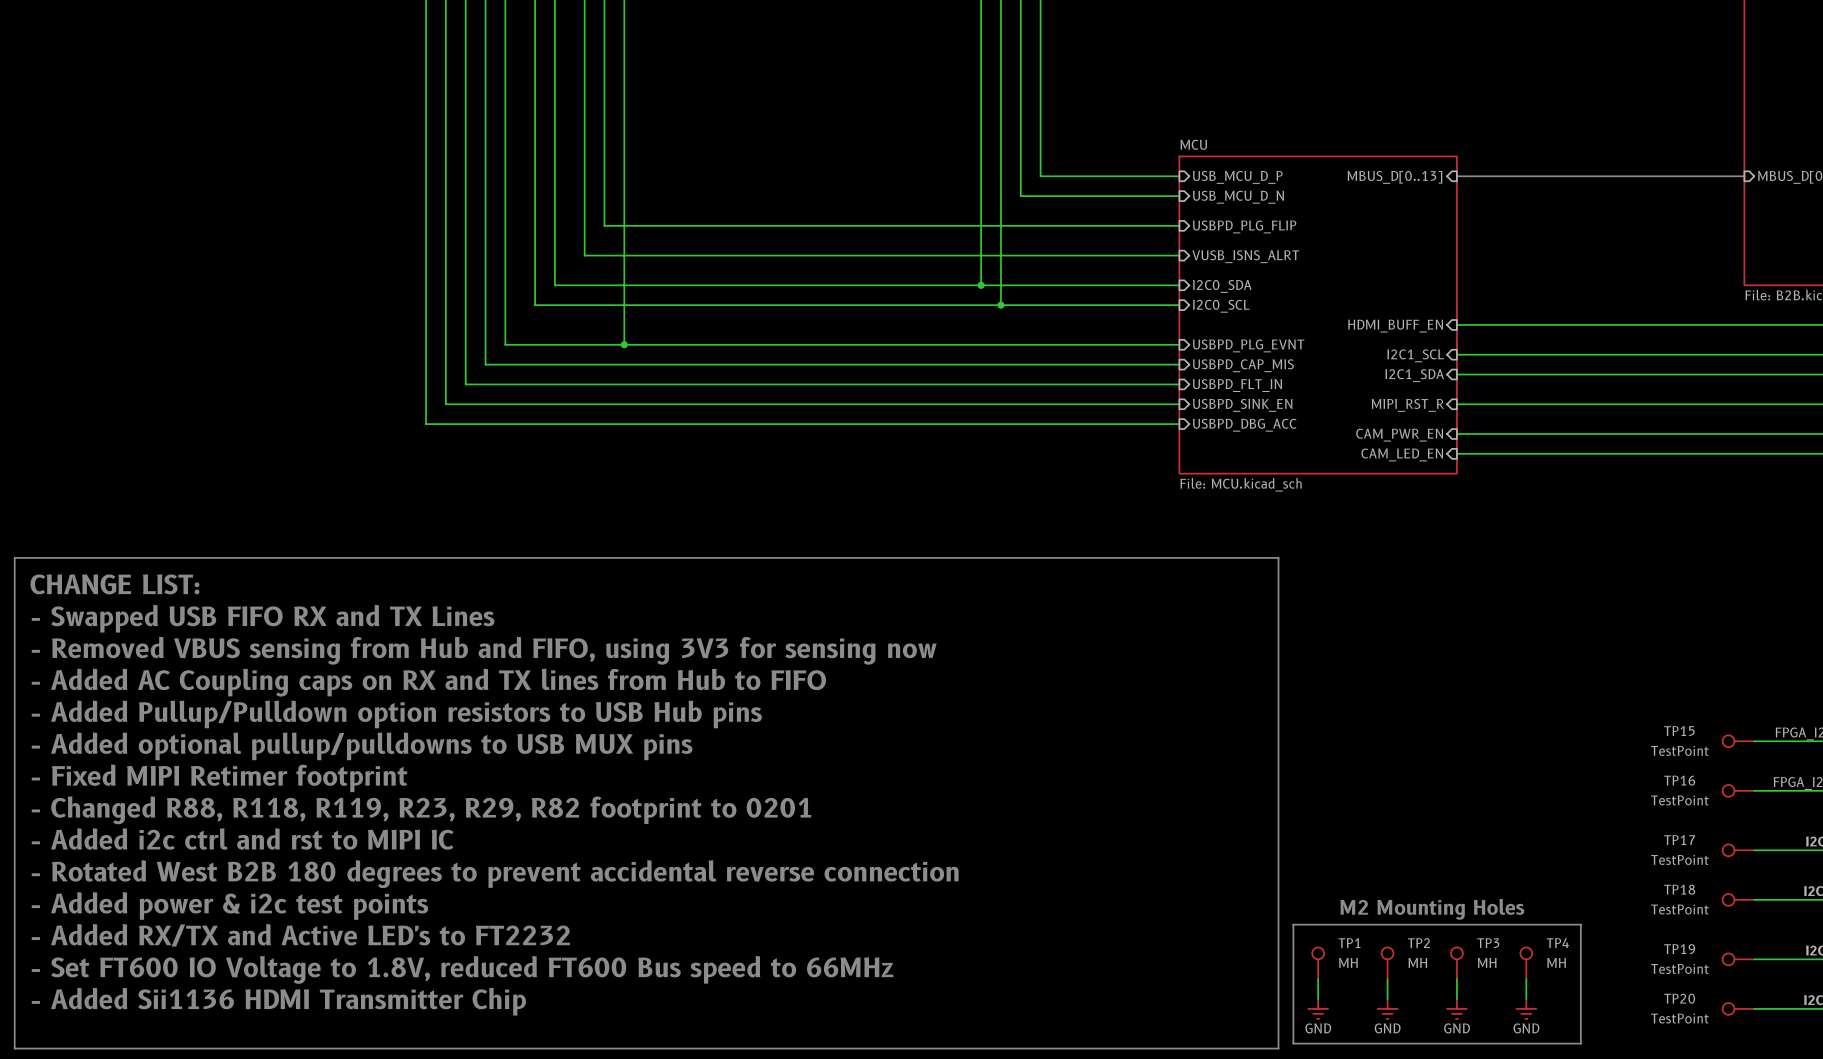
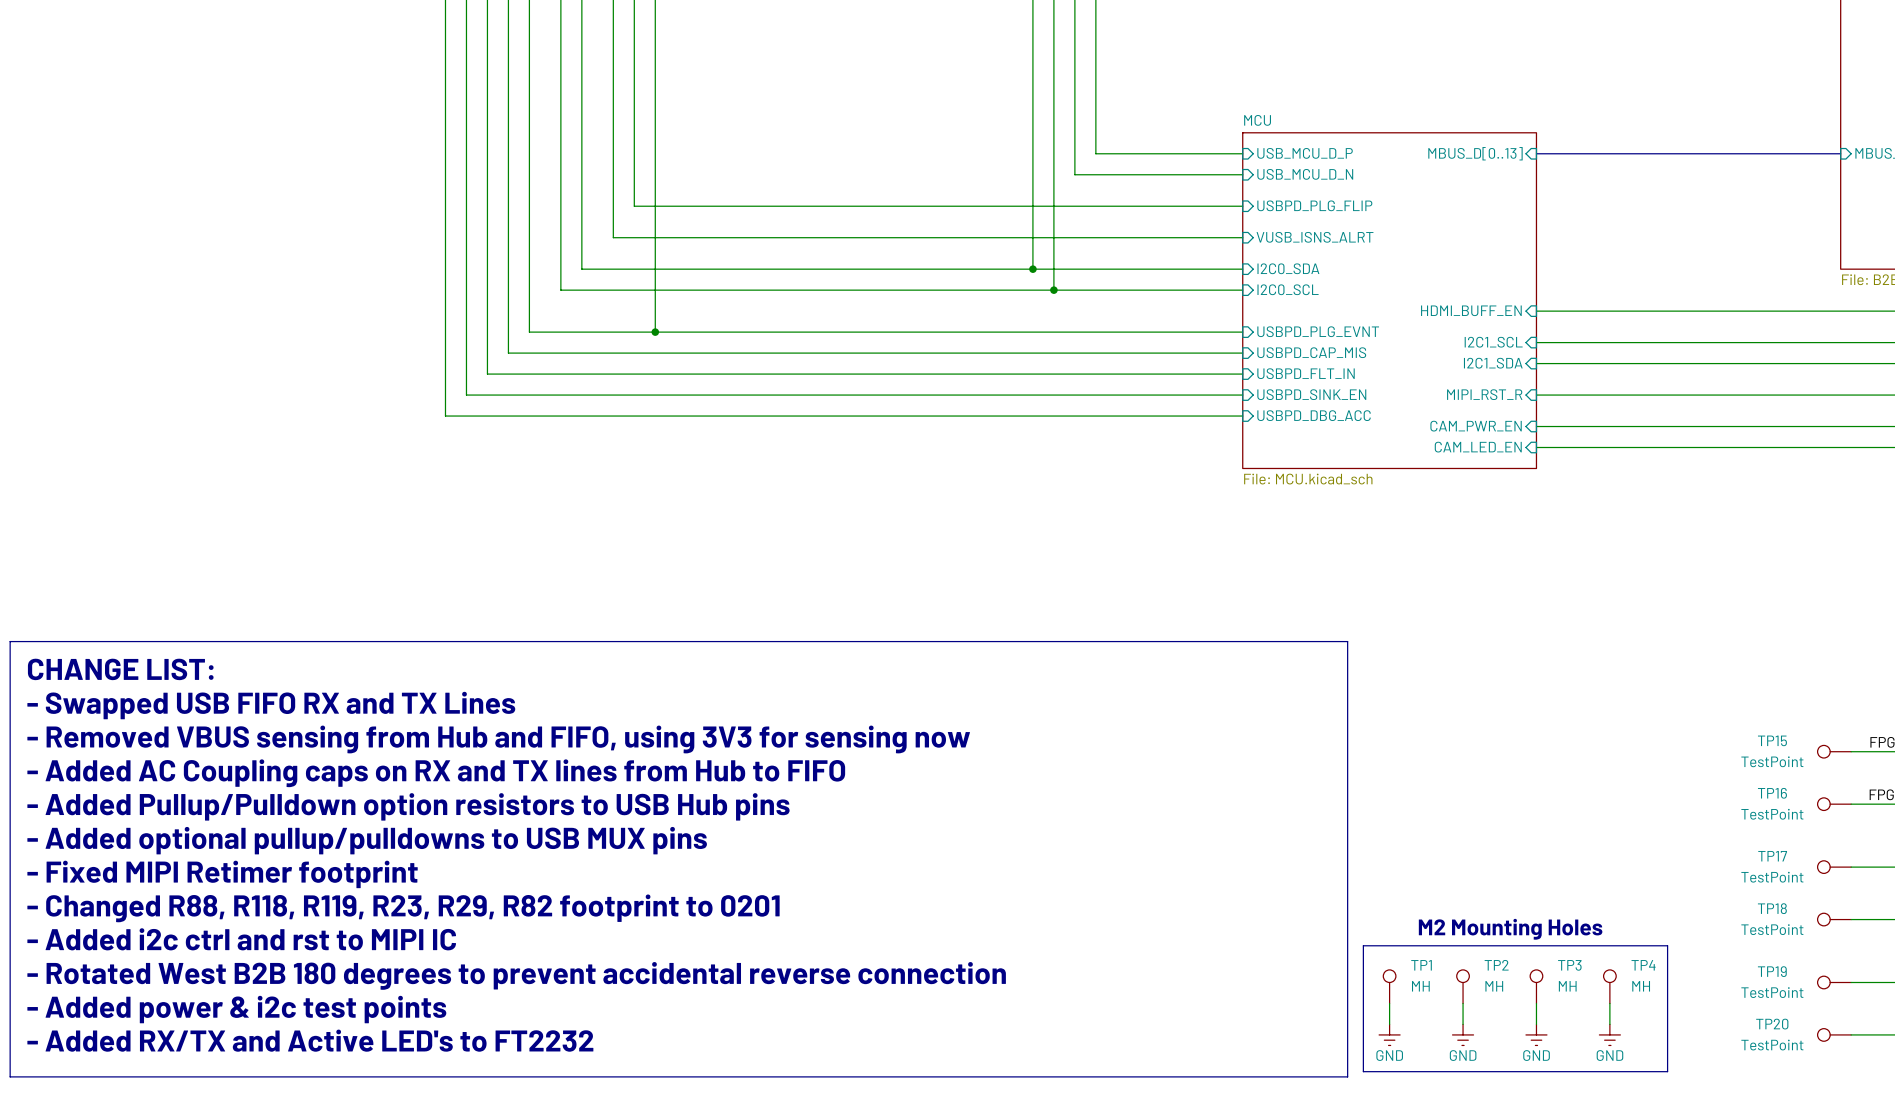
text position: CHANGE LIST: (114, 584) -> CHANGE LIST: (120, 669)
text position: - Swapped USB FIFO RX and TX Lines (263, 618) -> - Swapped USB FIFO RX and TX Lines (271, 705)
line: (14, 637) (14, 557) (1278, 557) (1278, 637) -> (10, 641) (1347, 641)
text position: - Removed VBUS sensing from Hub and FIFO, using 3V3 for sensing now (484, 650) -> - Removed VBUS sensing from Hub and FIFO, using 3V3 for sensing now (498, 739)
text position: - Added AC Coupling caps on RX and TX lines from Hub to FIFO (428, 682) -> - Added AC Coupling caps on RX and TX lines from Hub to FIFO (436, 773)
text position: - Added Pullup/Pulldown option resistors to USB Hub pins (396, 714) -> - Added Pullup/Pulldown option resistors to USB Hub pins (408, 806)
text position: - Added optional pullup/pulldowns to USB MUX pins (362, 746) -> - Added optional pullup/pulldowns to USB MUX pins (367, 840)
text position: - Fixed MIPI Retimer footprint (219, 778) -> - Fixed MIPI Retimer footprint (222, 874)
text position: - Changed R88, R118, R119, R23, R29, R82 footprint to 0201 (421, 810) -> - Changed R88, R118, R119, R23, R29, R82 footprint to 0201 (403, 908)
text position: - Added i2c ctrl and rst to MIPI IC (242, 838) -> - Added i2c ctrl and rst to MIPI IC (241, 939)
text position: - Rotated West B2B 180 degrees to prevent accidental reverse connection (495, 874) -> - Rotated West B2B 180 degrees to prevent accidental reverse connection (516, 975)
text position: - Added power & i2c test points (229, 905) -> - Added power & i2c test points (236, 1009)
text position: - Added RX/TX and Active LED's to FT2232 (300, 935) -> - Added RX/TX and Active LED's to FT2232 (310, 1040)
text: - Set FT600 IO Voltage to 1.8V, reduced FT600 Bus speed to 66MHz (462, 969) -> none
text: - Added Sii1136 HDMI Transmitter Chip (278, 1001) -> none

